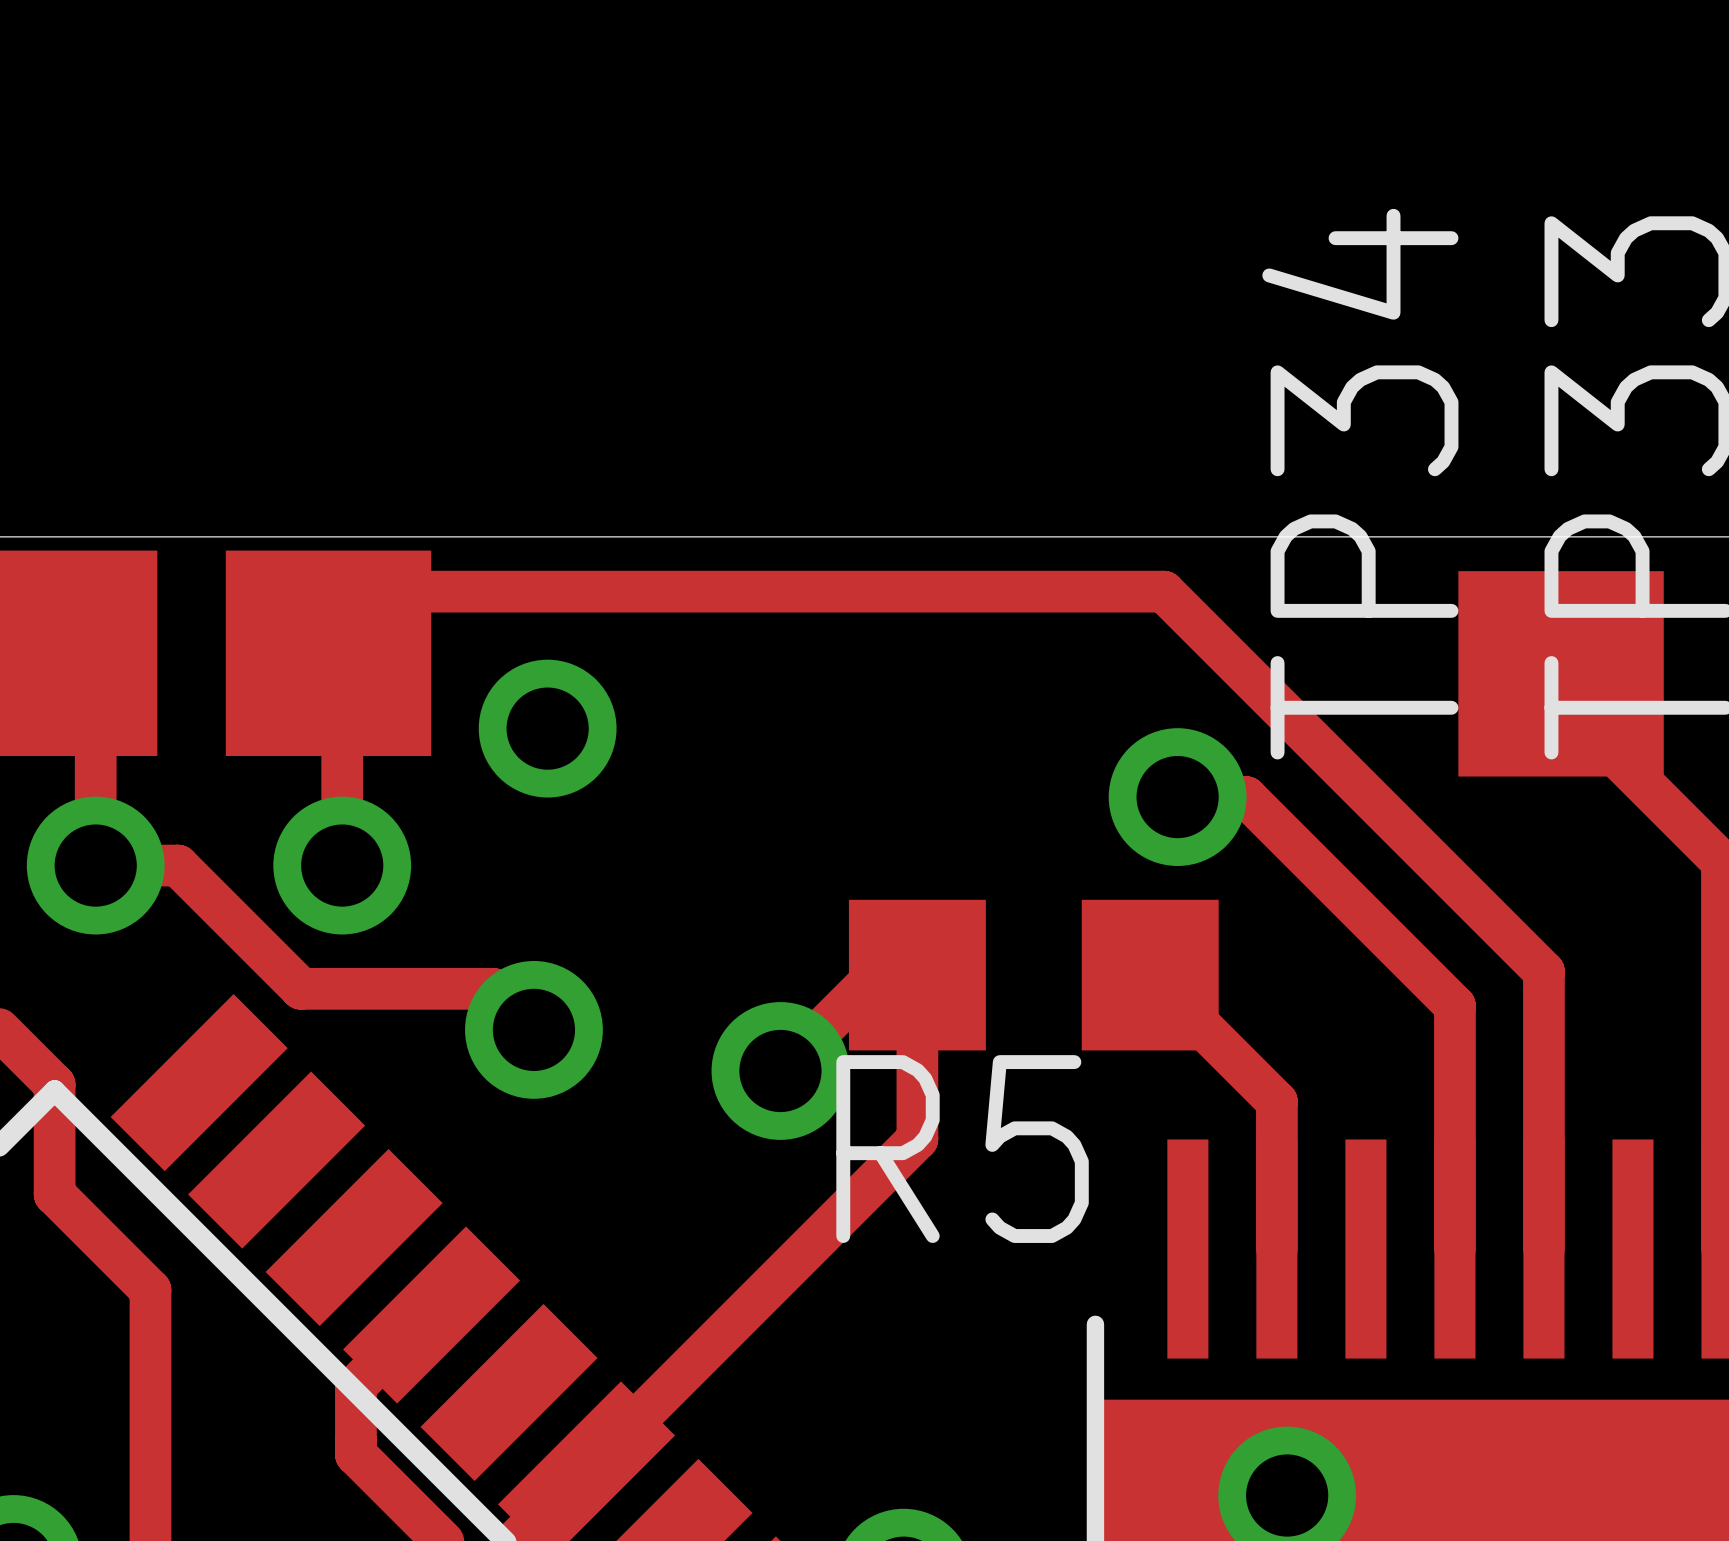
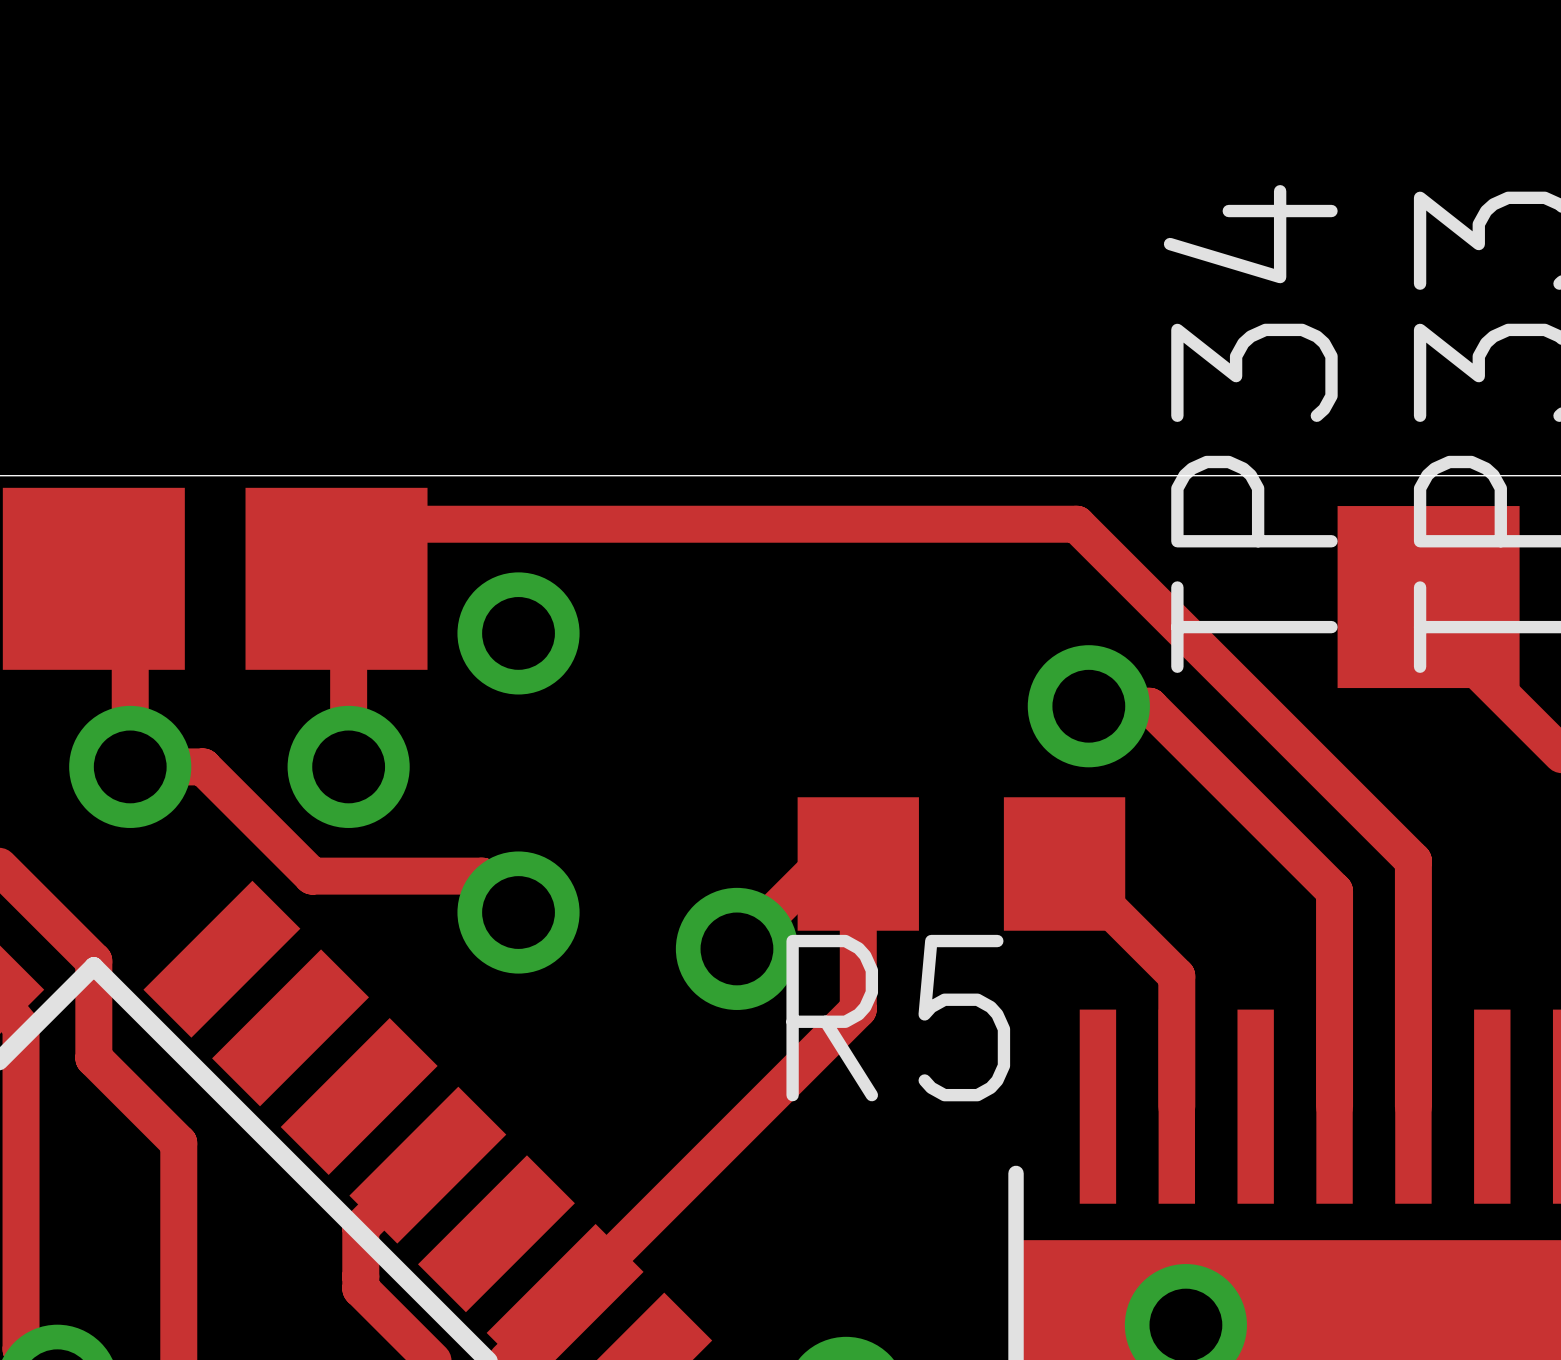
via position: (547, 728) -> (518, 633)

